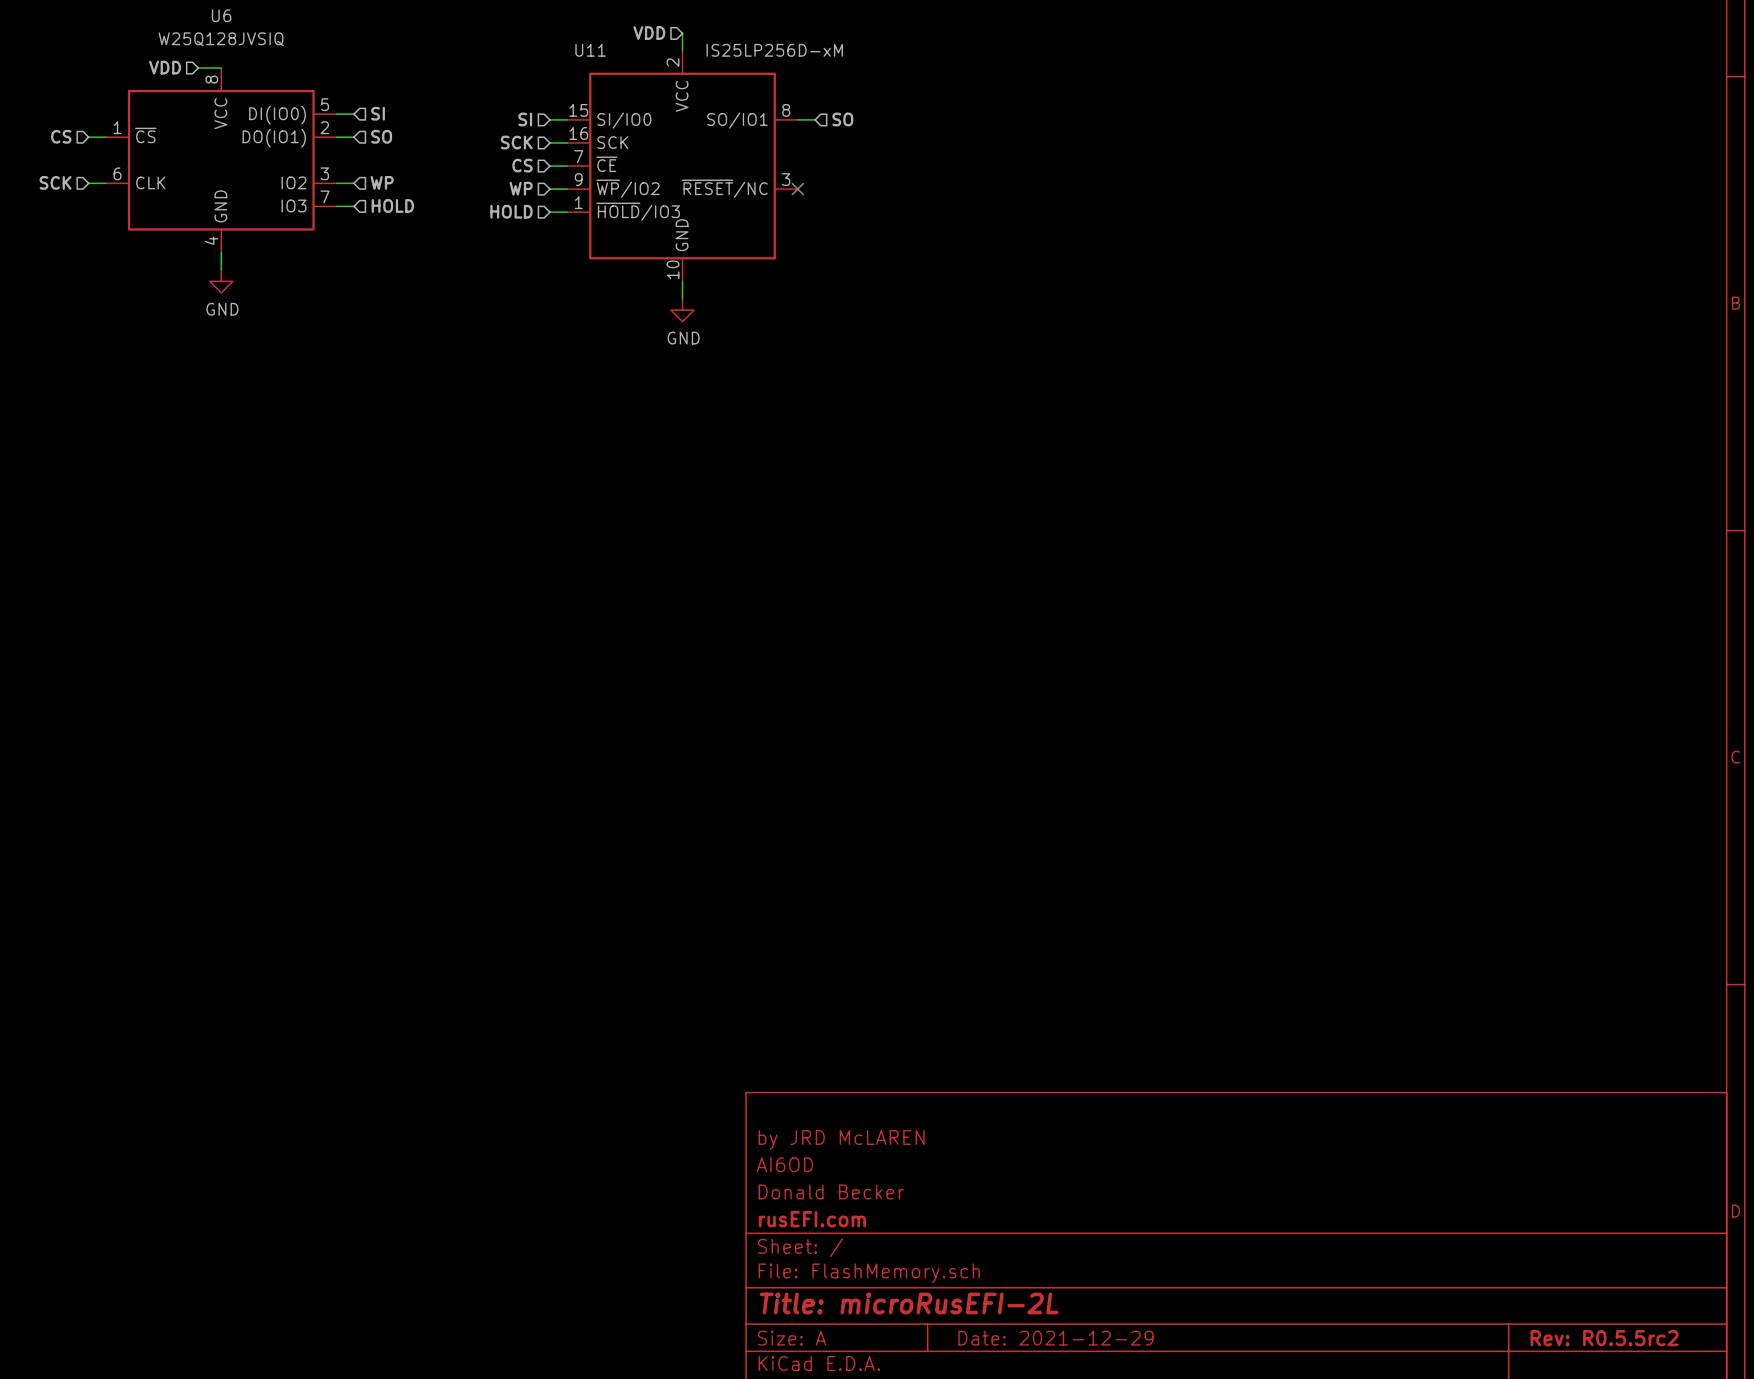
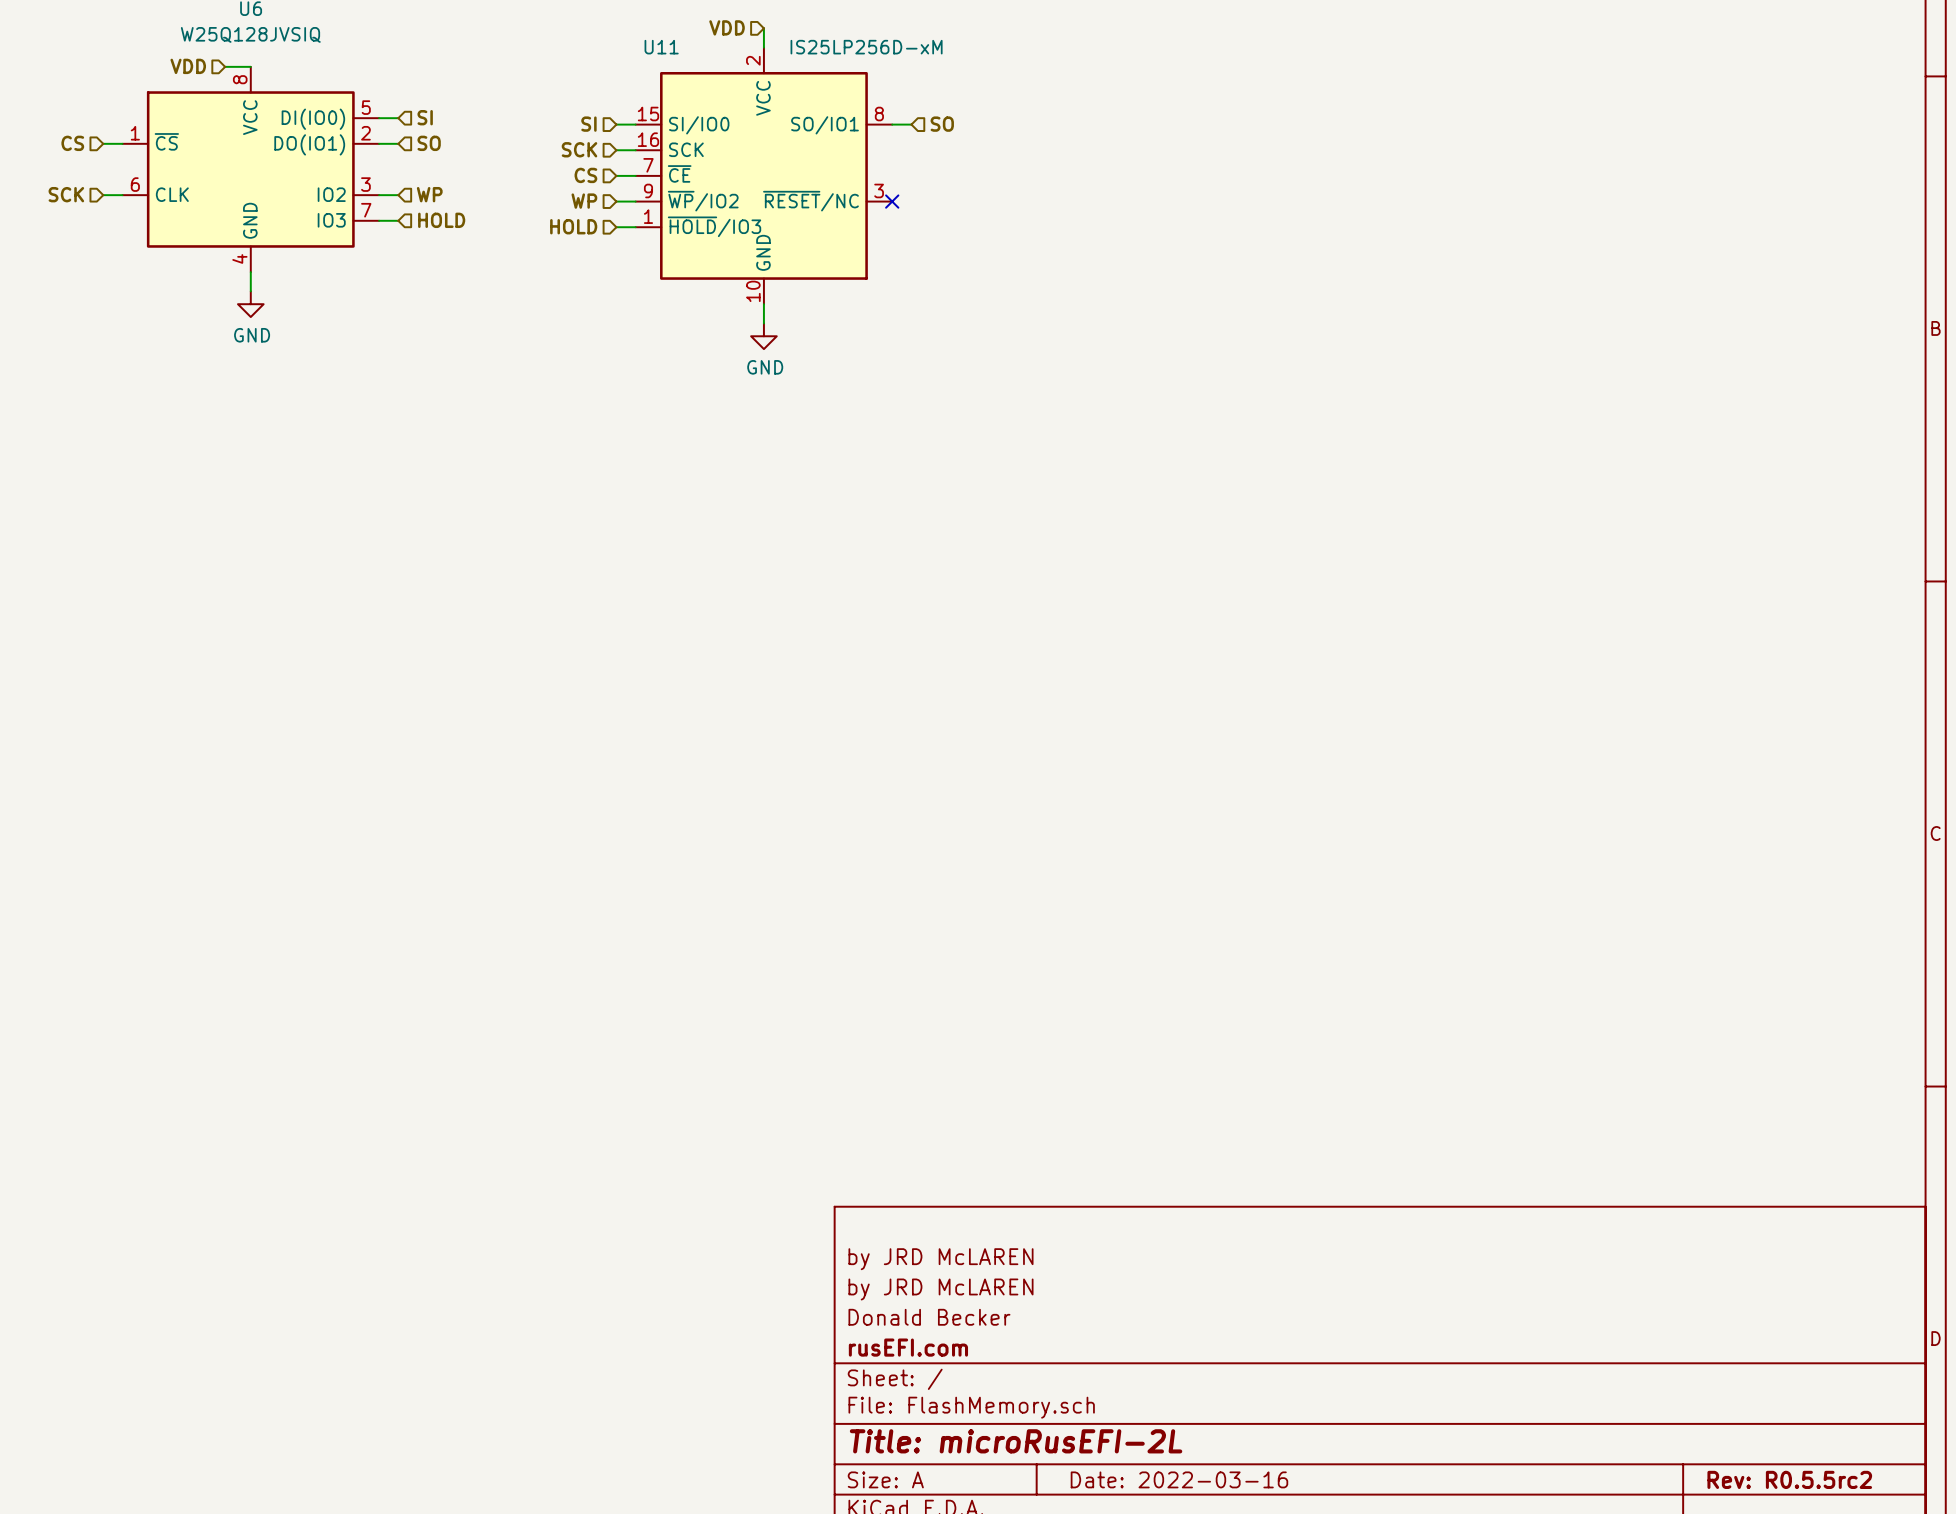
title block: AI6OD (784, 1164) -> by JRD McLAREN (941, 1289)
title block: Date: 2021-12-29 (1056, 1338) -> Date: 2022-03-16 (1179, 1479)

